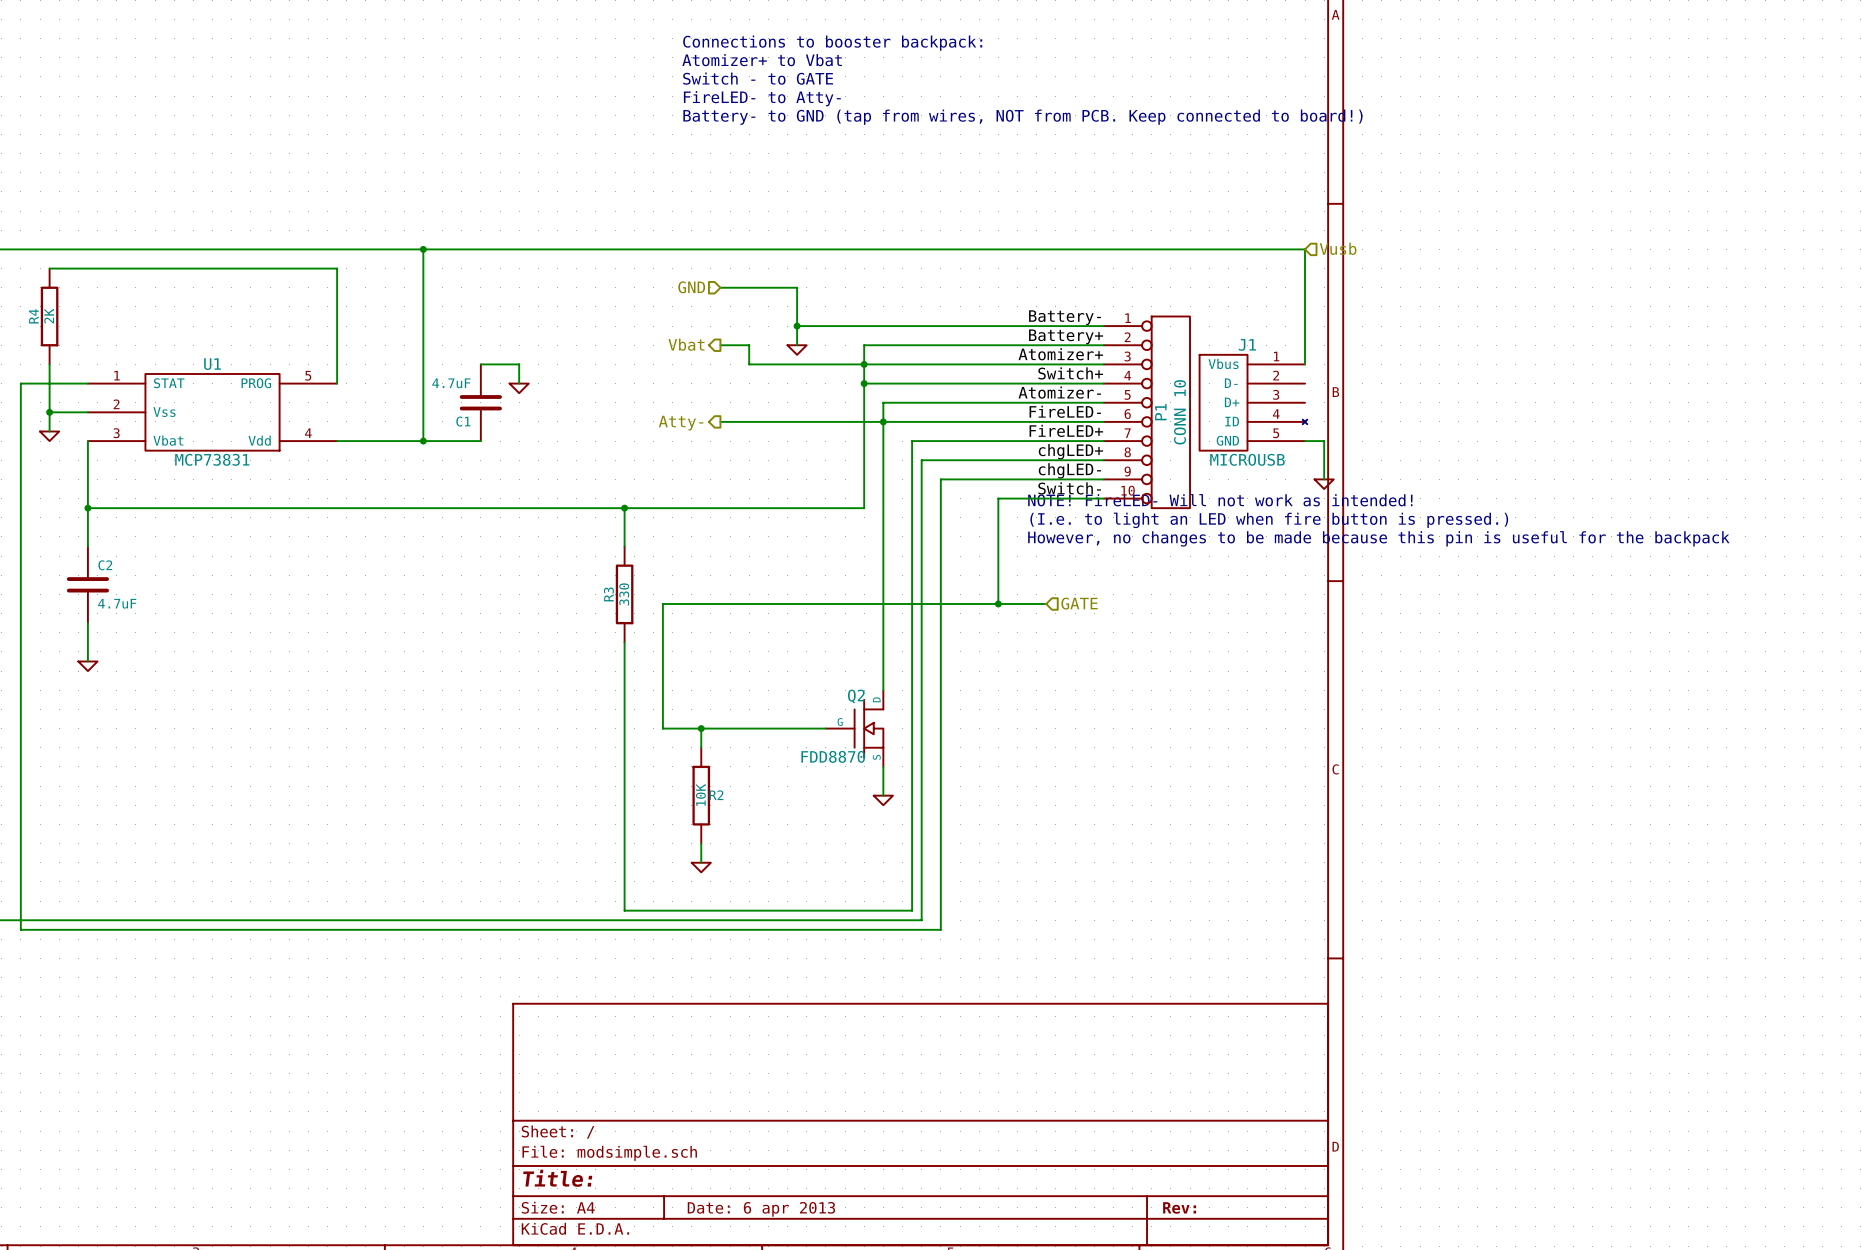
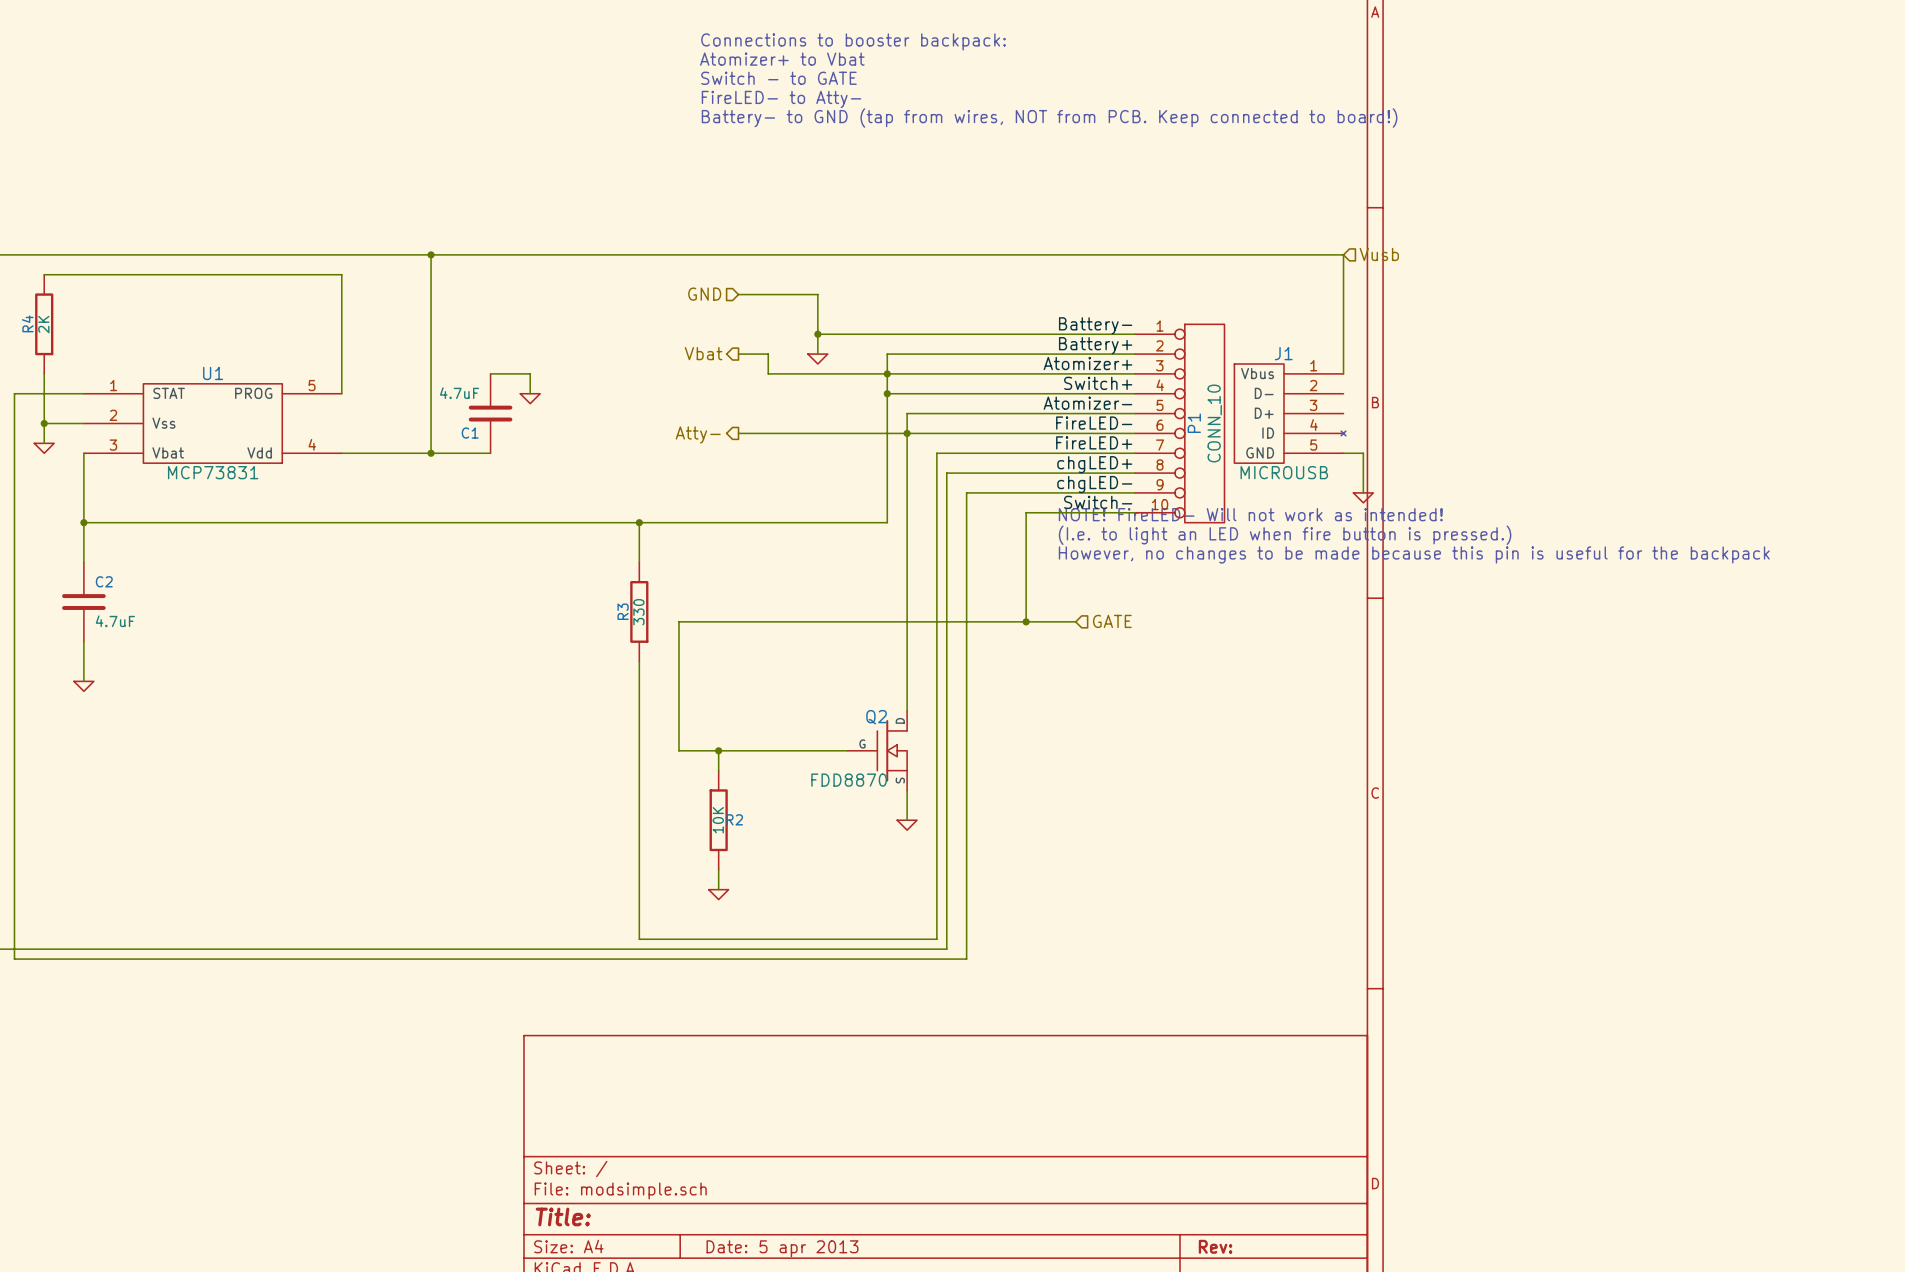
title block: Date: 6 apr 2013 (761, 1209) -> Date: 5 apr 2013 (782, 1248)

